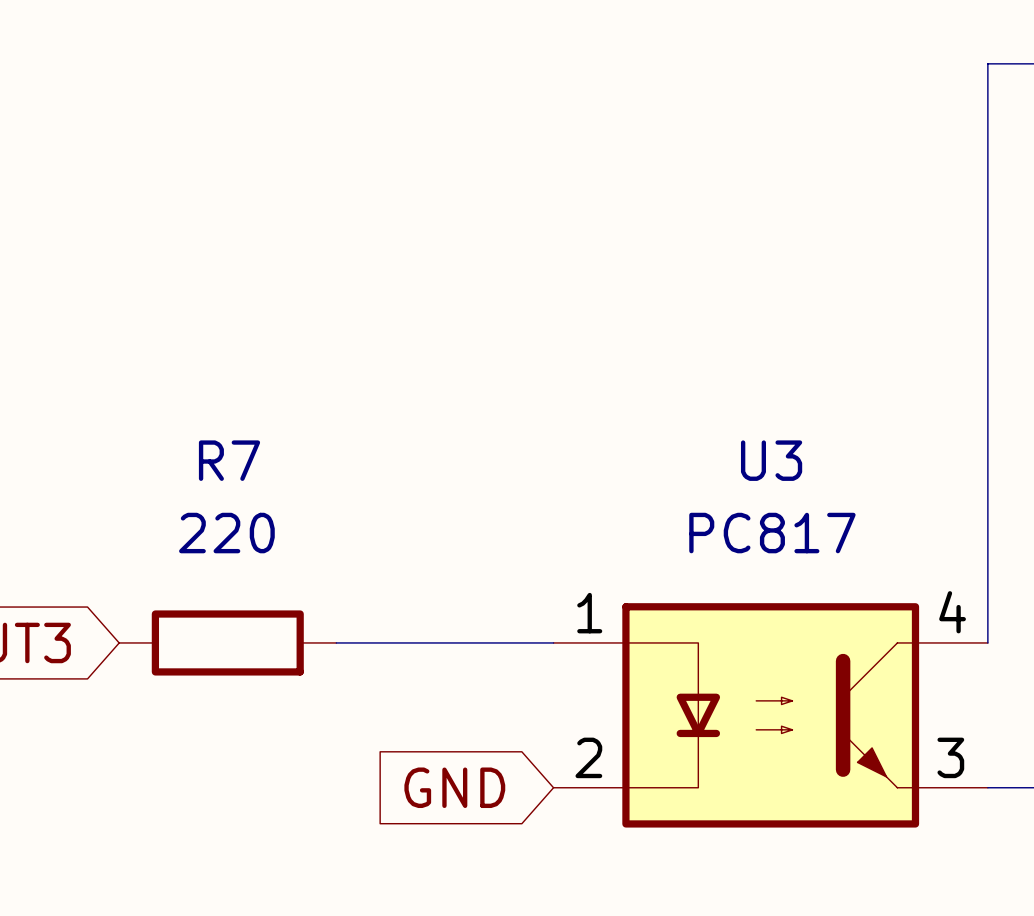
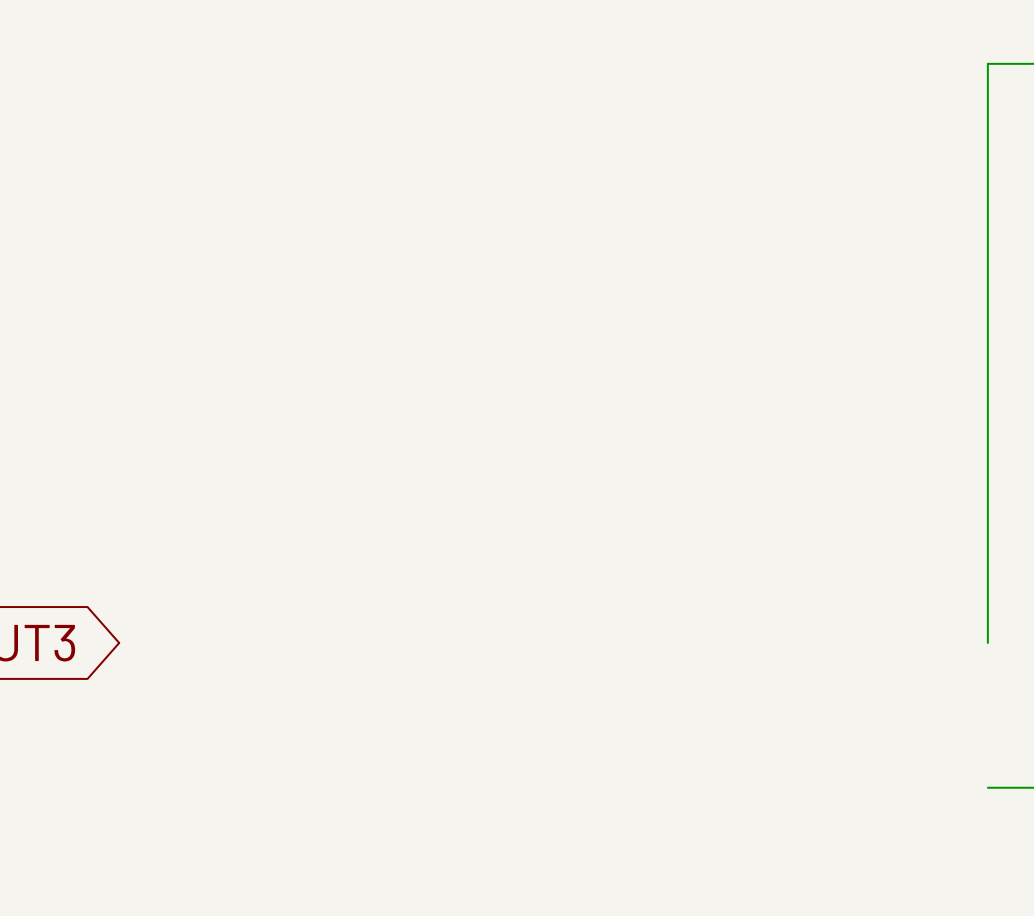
R7: 220 (227, 642) -> none
wire: (336, 642) (553, 642) -> none
U3: PC817 (770, 715) -> none
global label: GND (454, 787) -> none

